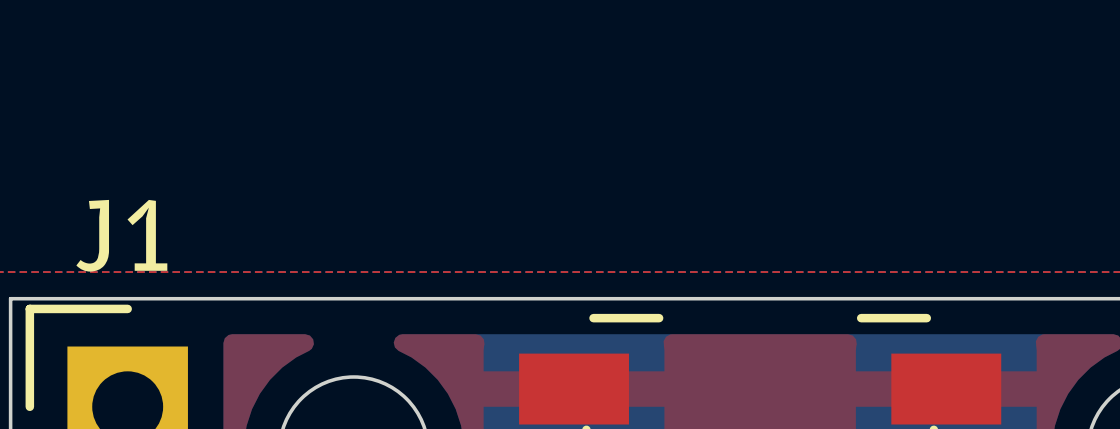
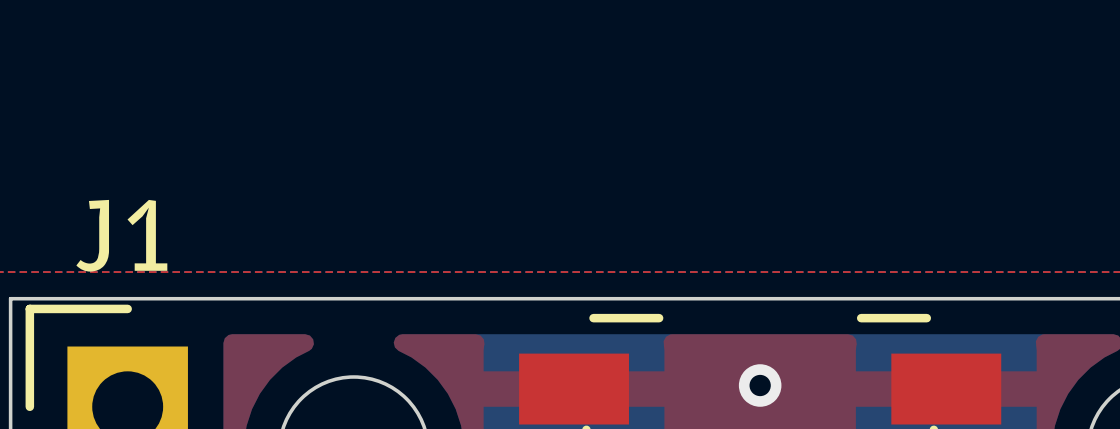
via: none -> (760, 385)

